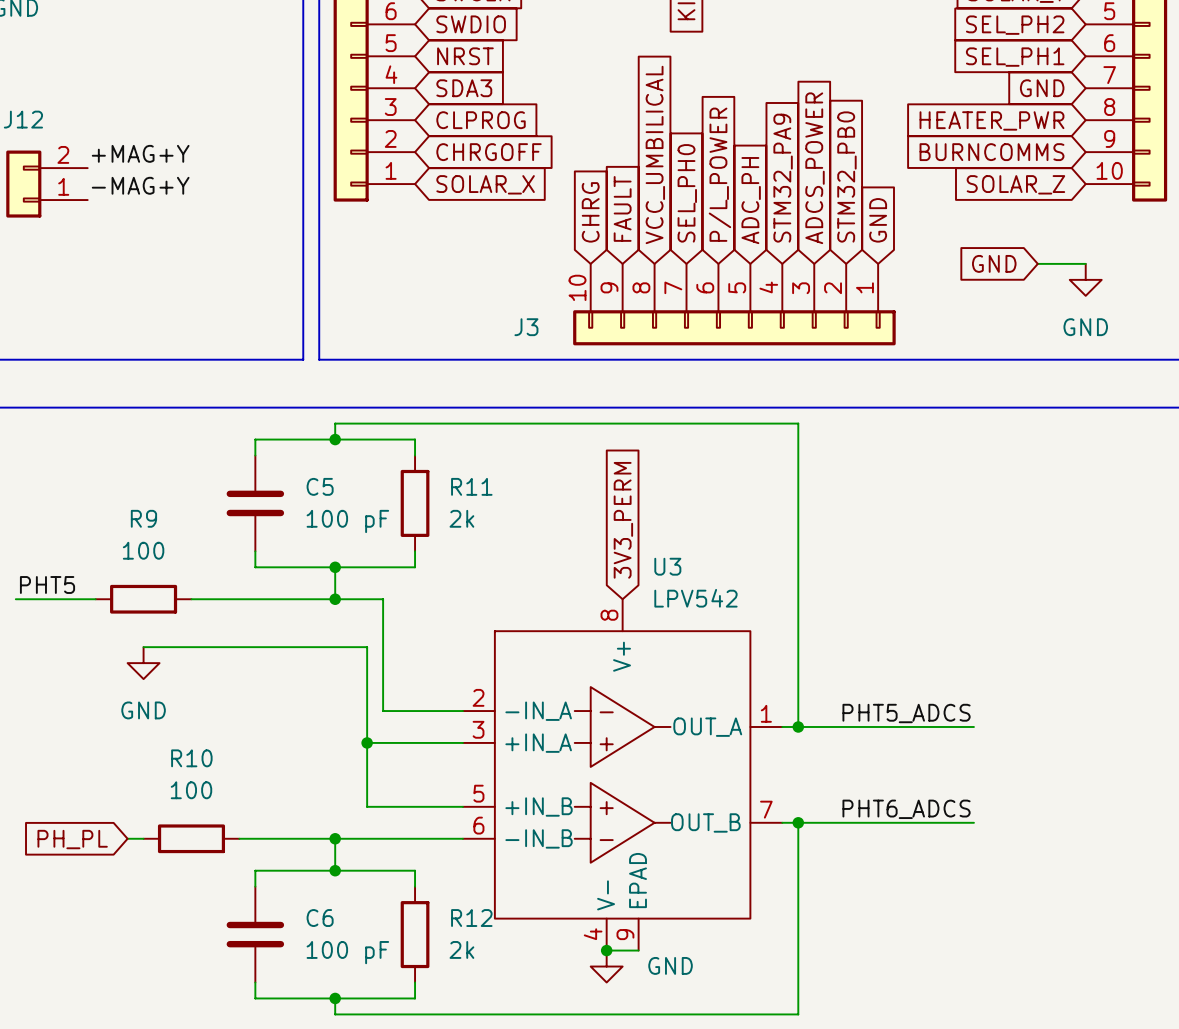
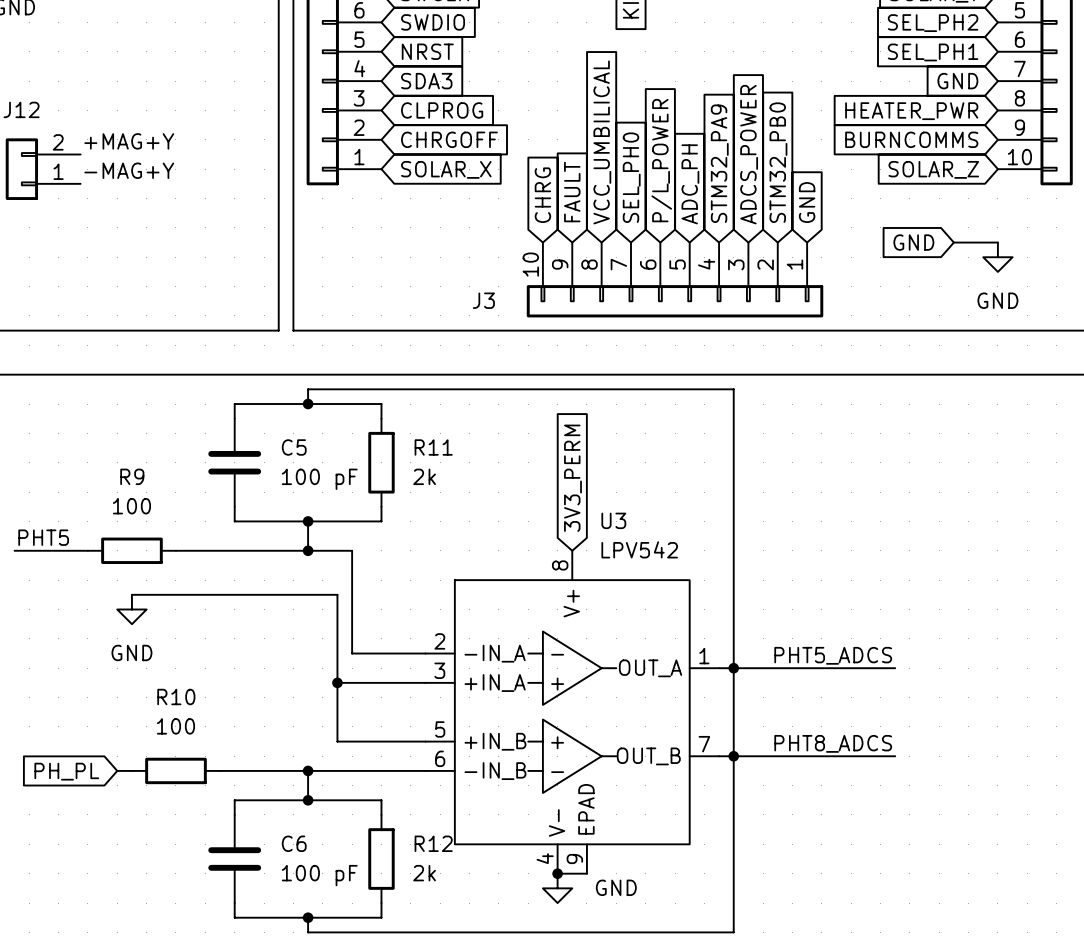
wire: none -> (733, 668) (733, 756)
label: PHT6_ADCS (906, 809) -> PHT8_ADCS (833, 743)

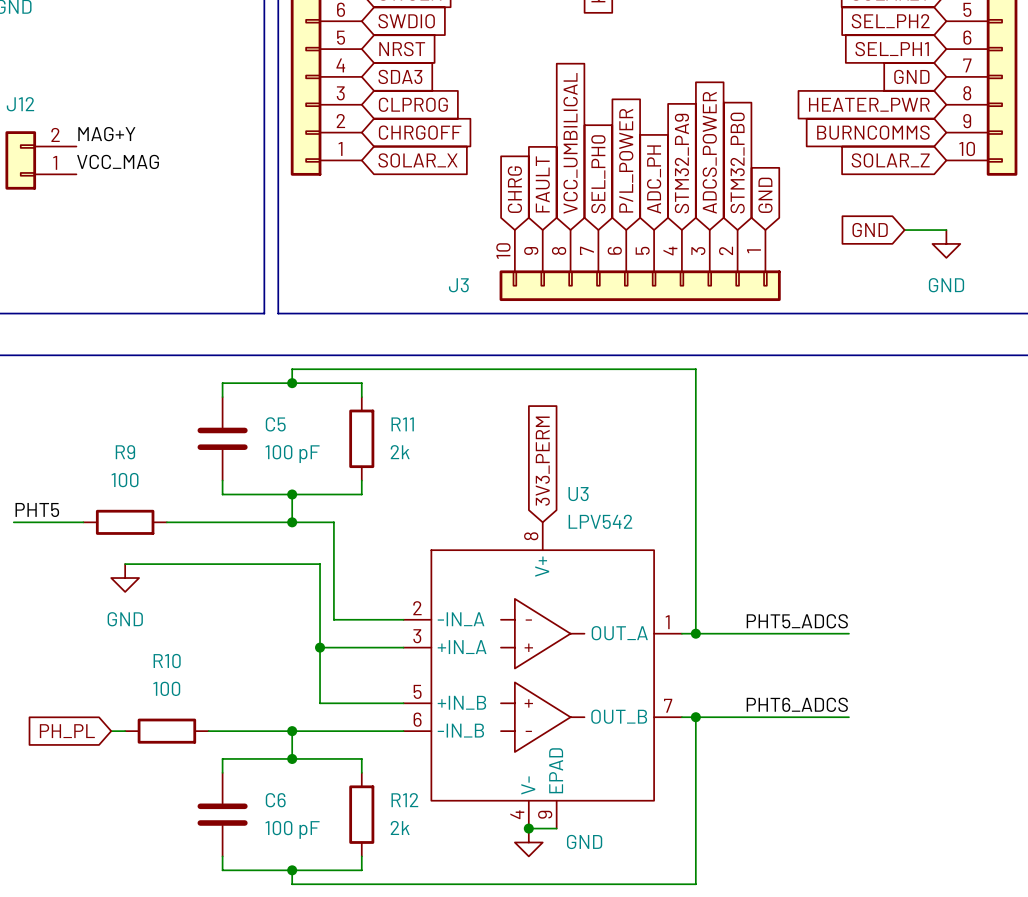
label: +MAG+Y (129, 141) -> MAG+Y (106, 134)
label: -MAG+Y (129, 170) -> VCC_MAG (118, 161)
wire: (733, 668) (733, 756) -> none
label: PHT8_ADCS (833, 743) -> PHT6_ADCS (797, 704)

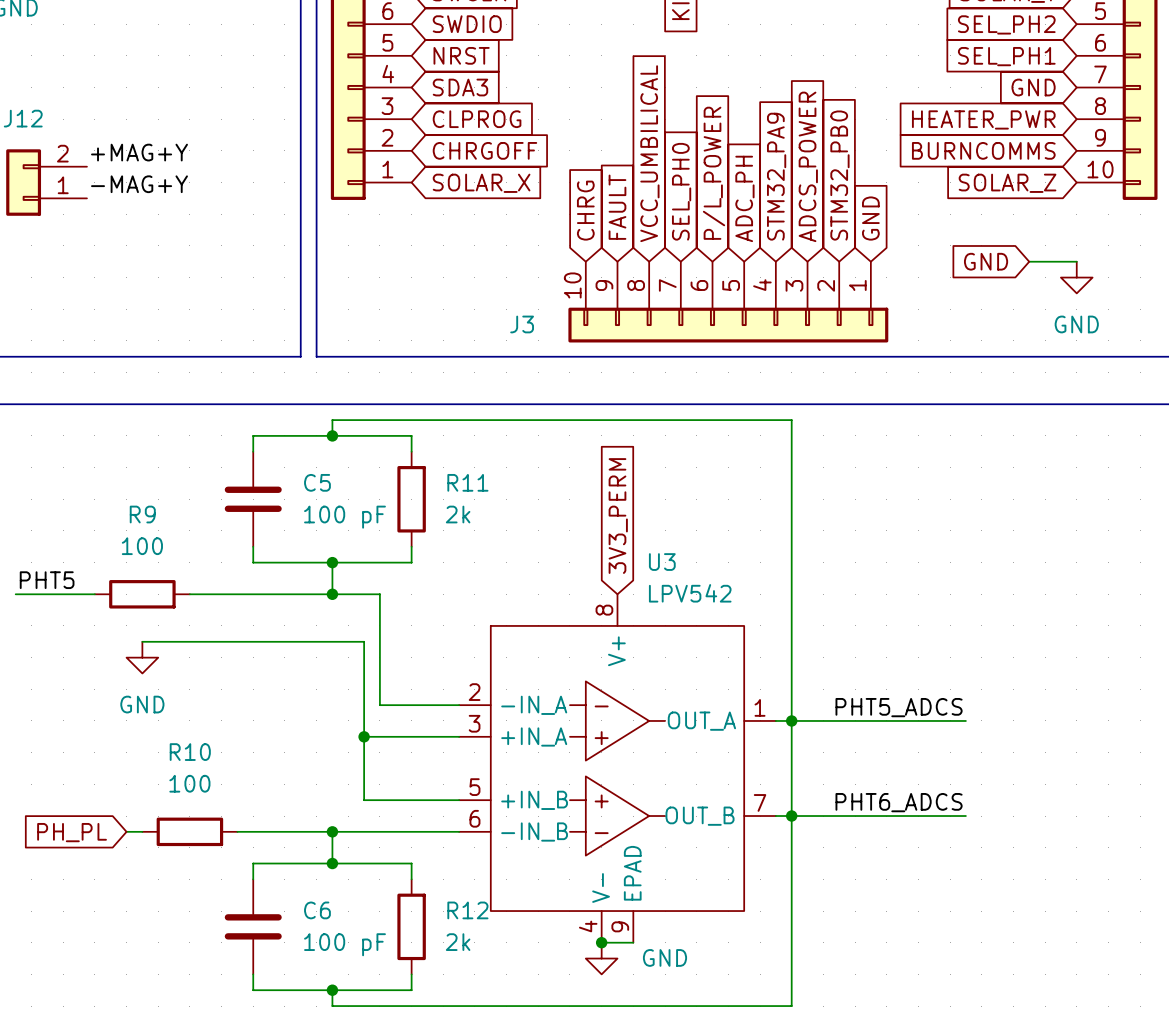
label: MAG+Y (106, 134) -> +MAG+Y (139, 152)
label: VCC_MAG (118, 161) -> -MAG+Y (139, 184)
wire: none -> (791, 720) (791, 816)

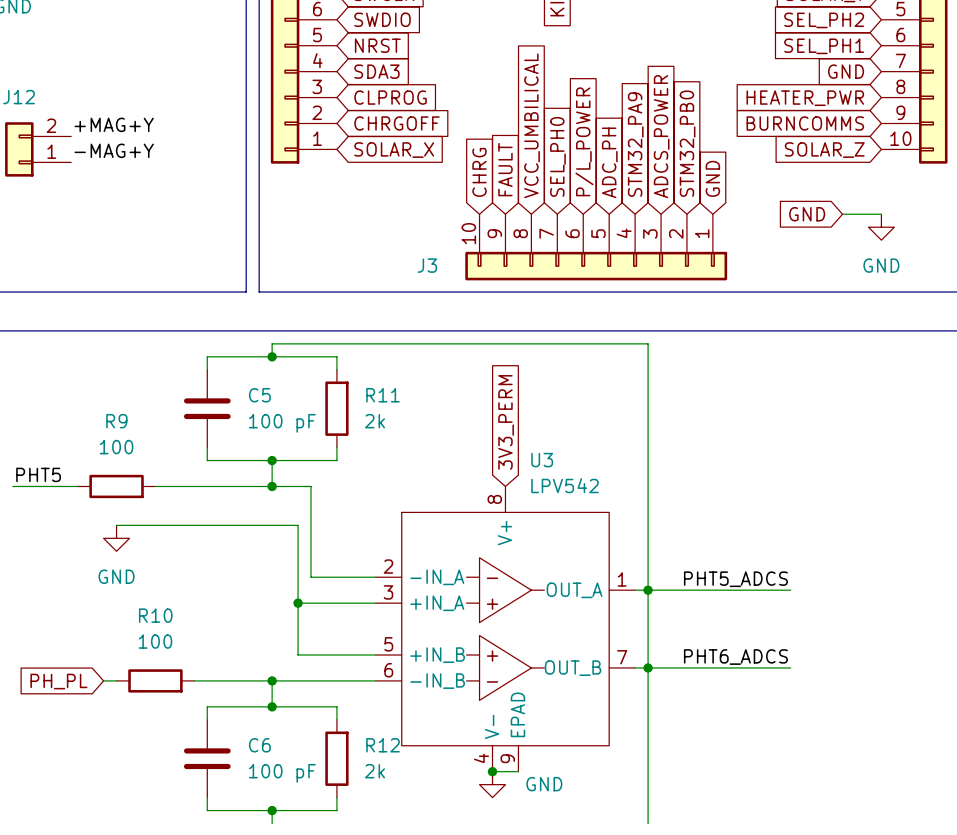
wire: (332, 1006) (791, 1006) -> none

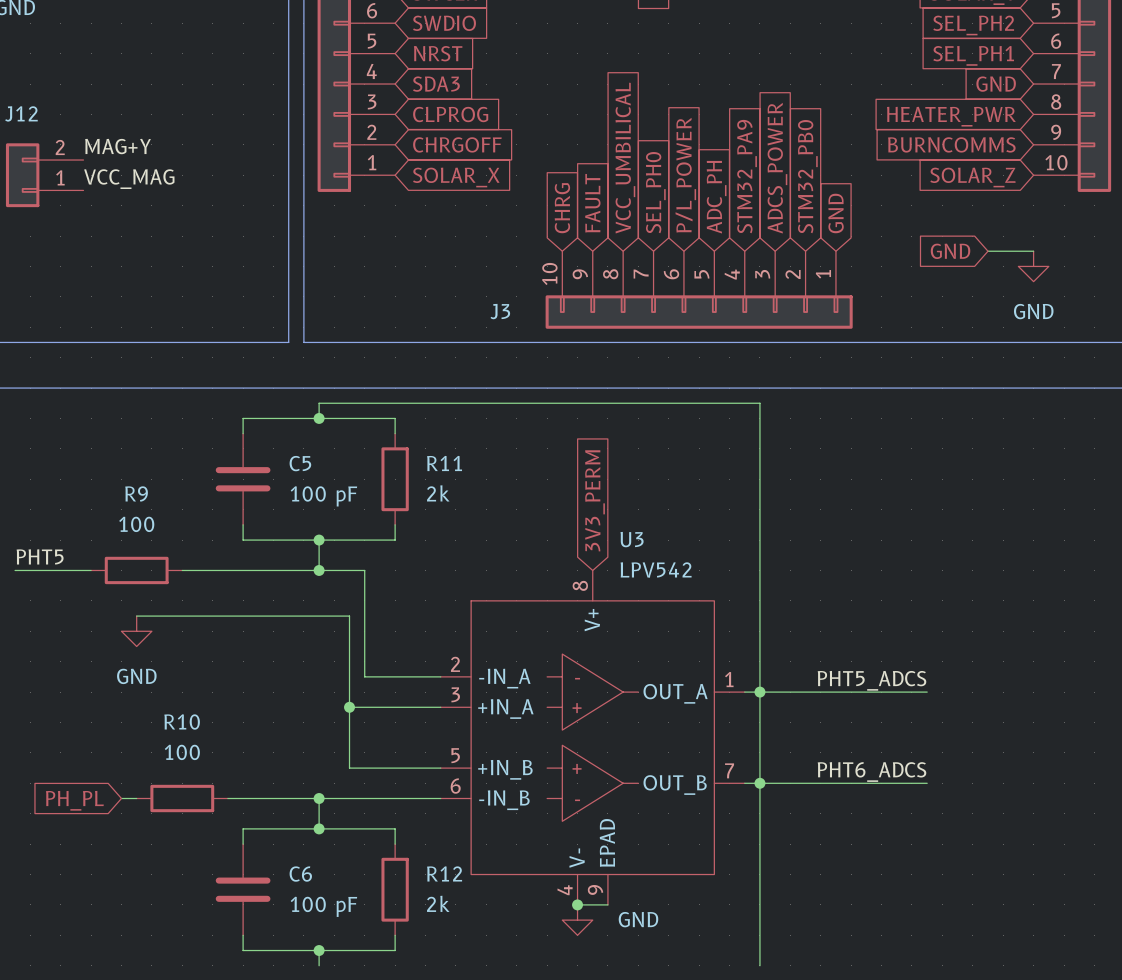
label: +MAG+Y (114, 124) -> MAG+Y (118, 146)
label: -MAG+Y (114, 150) -> VCC_MAG (129, 179)

